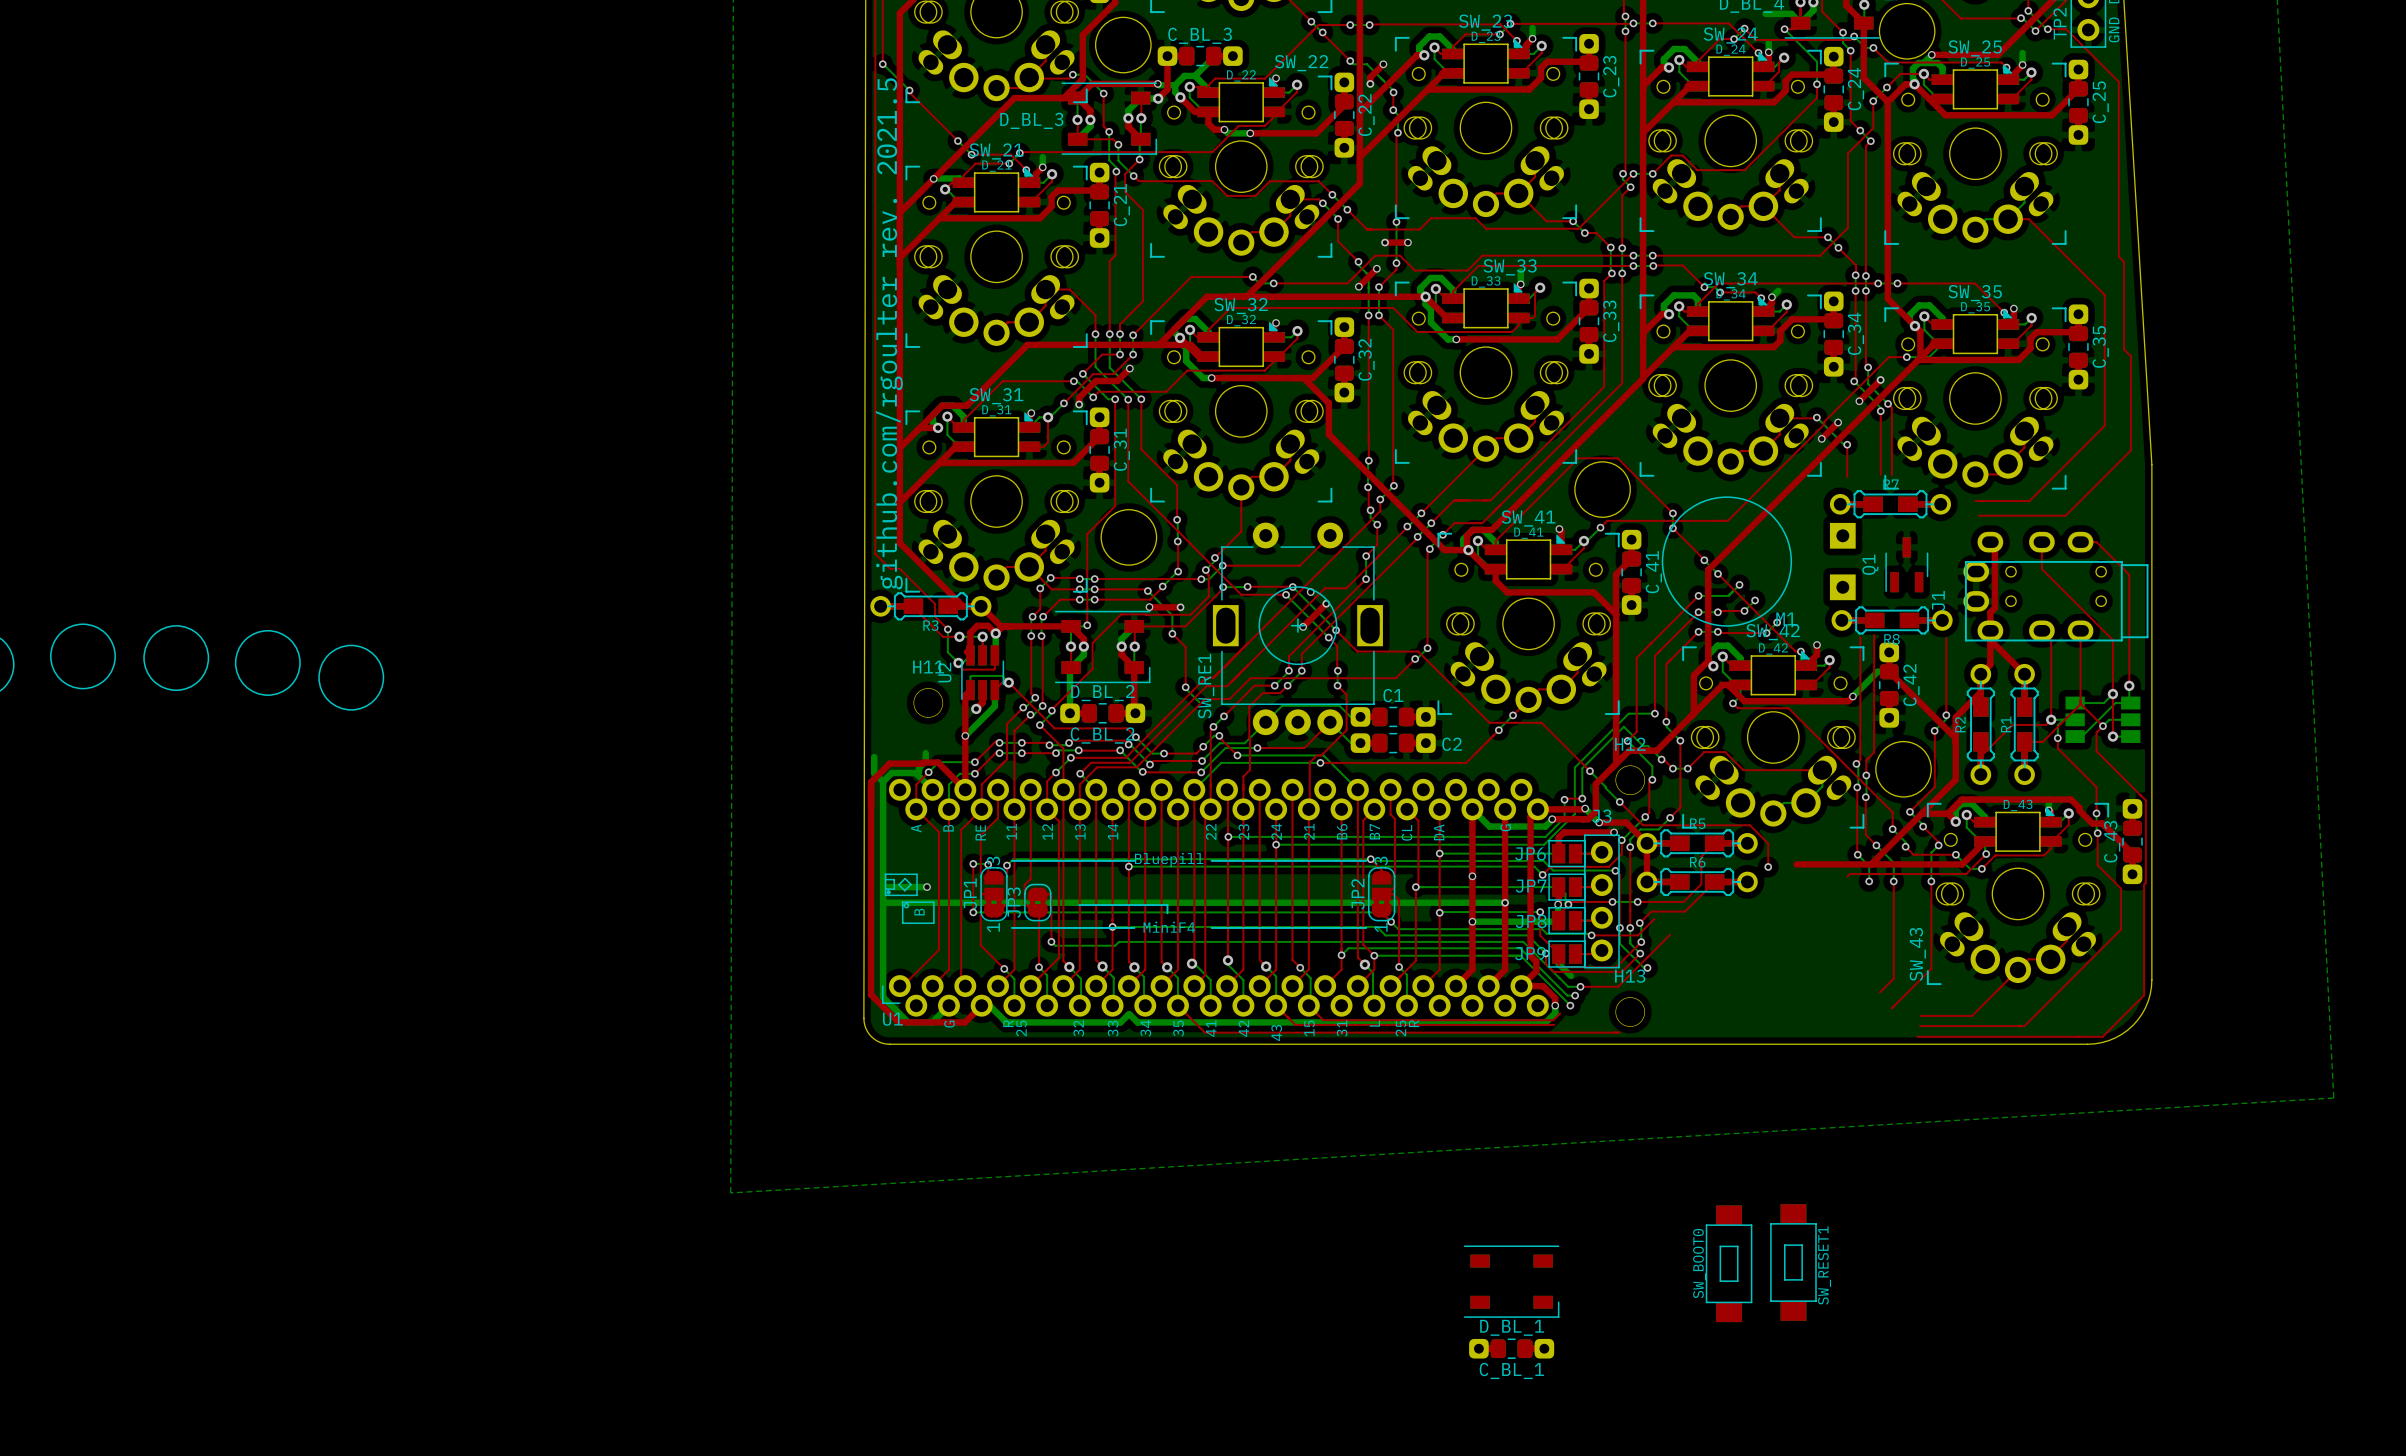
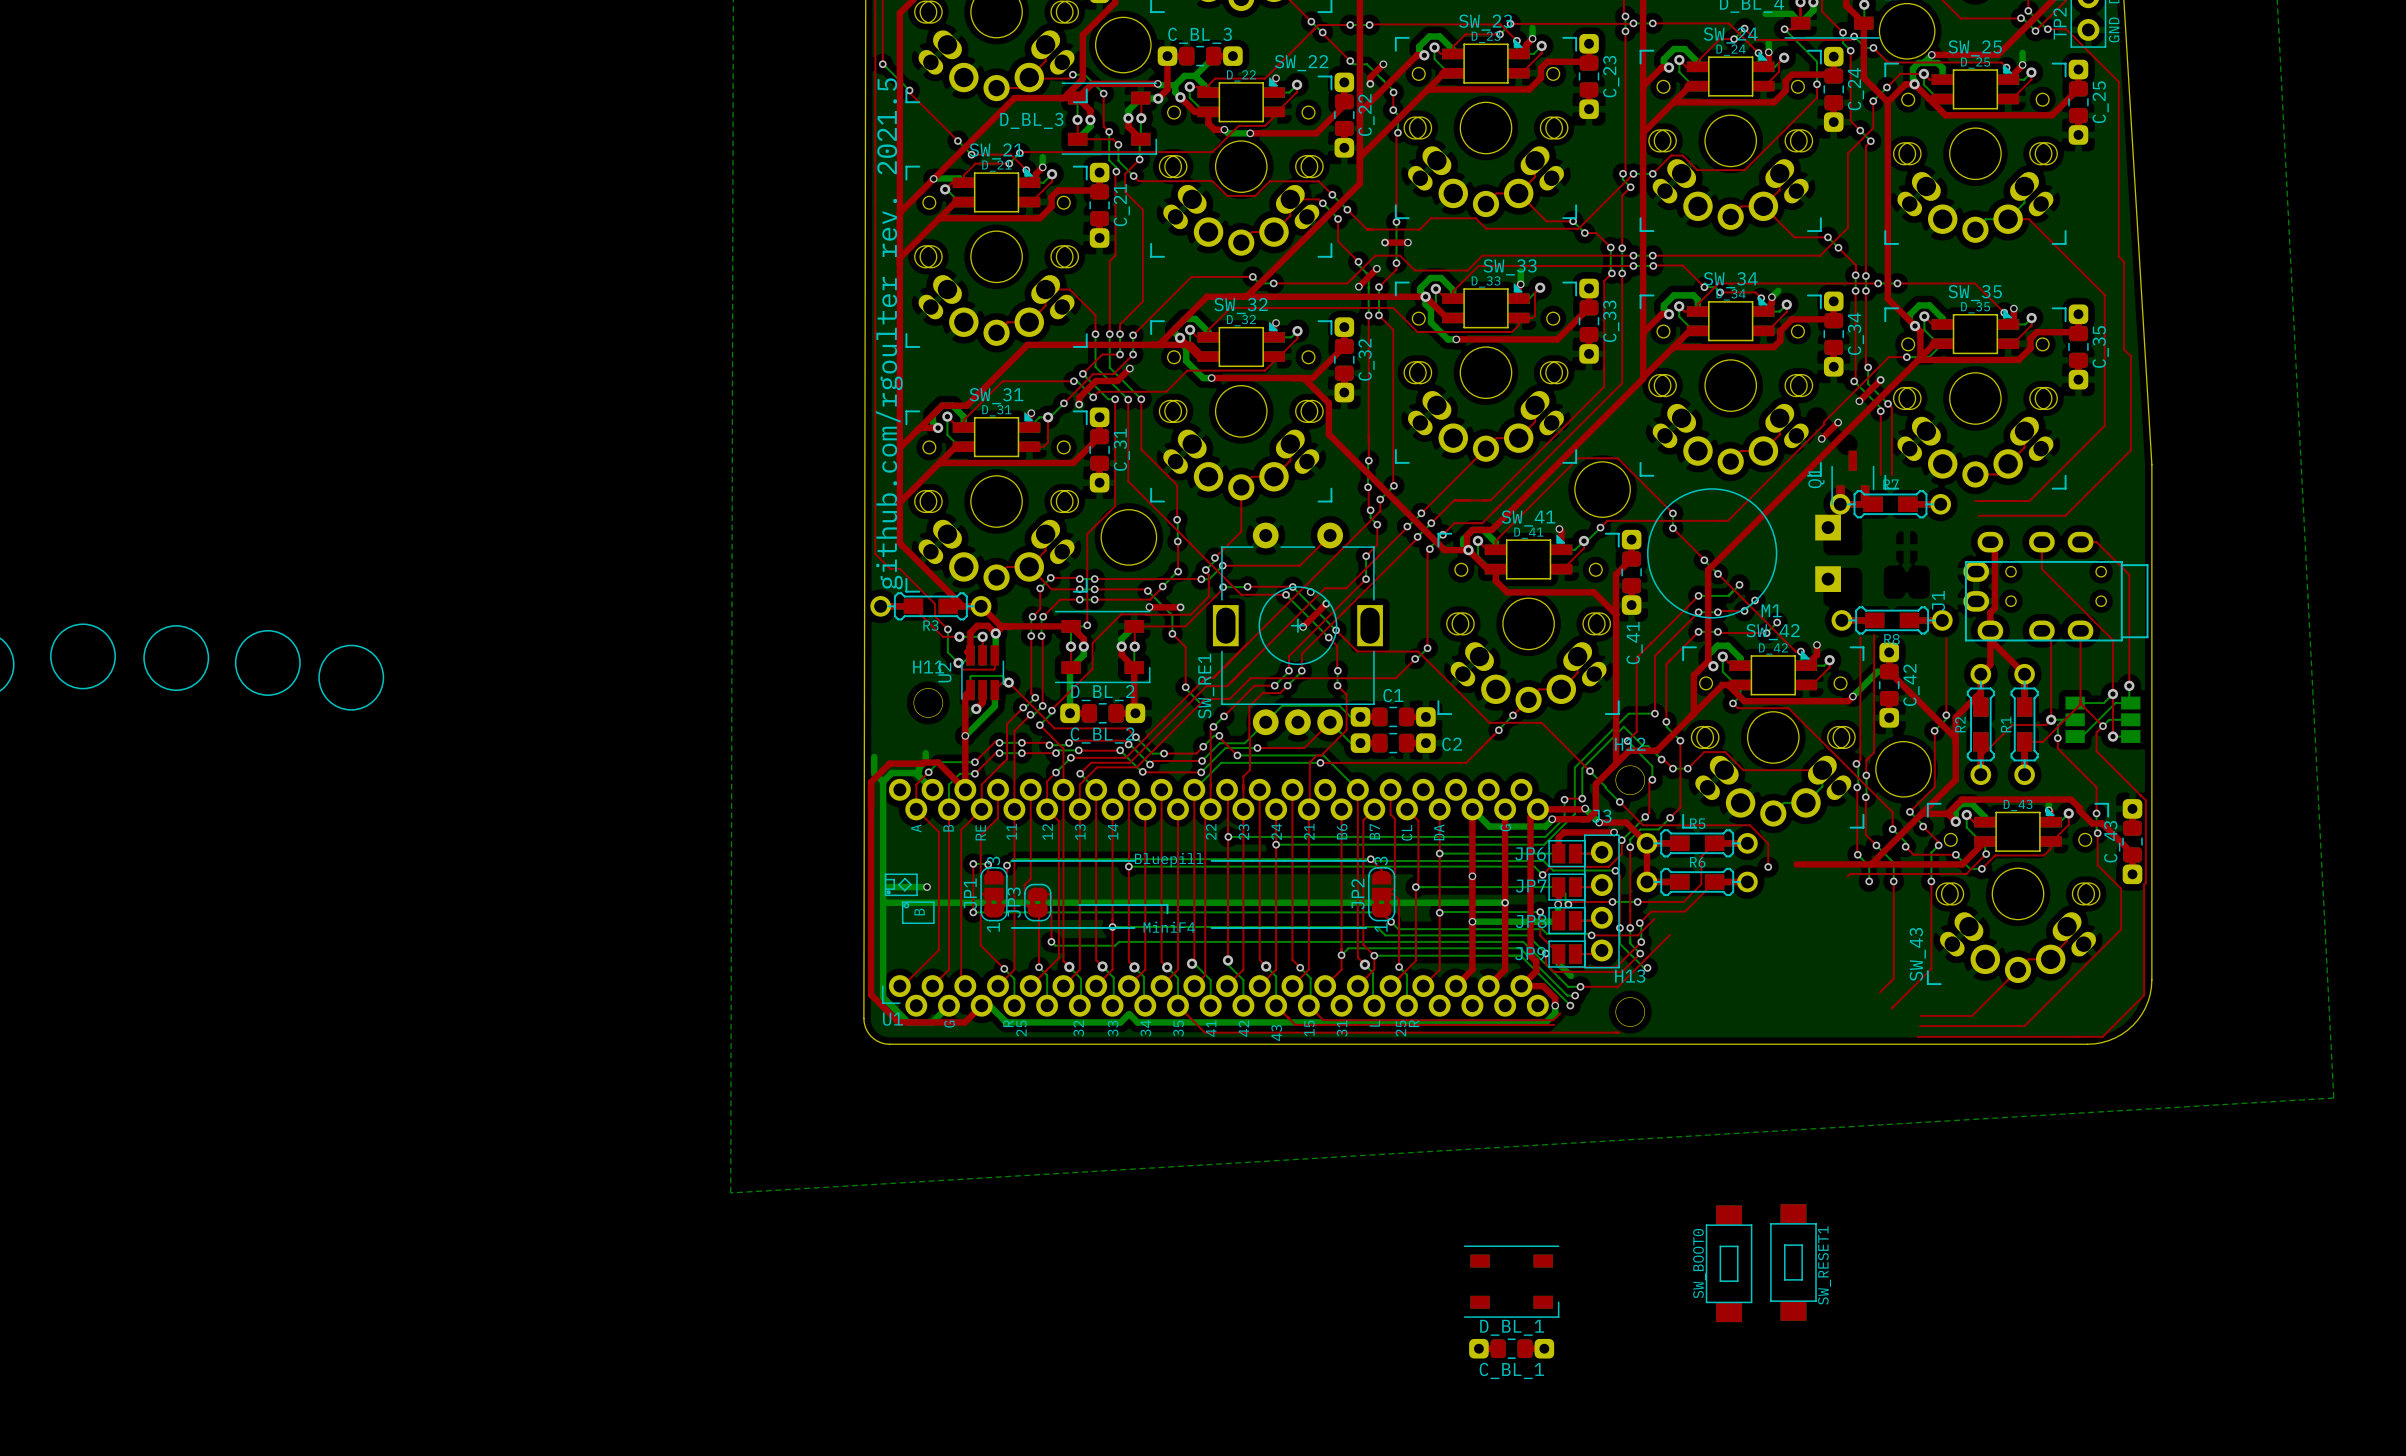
bottom track: (1816, 417) (1843, 444) (1847, 444) -> none
top track: (1816, 417) (1779, 418) -> none
via: (1816, 417) -> none
top track: (1847, 444) (1847, 477) -> none
via: (1847, 444) -> none
M1 position: (1758, 561) -> (1743, 553)
Q1 position: (1906, 564) -> (1852, 478)
C_41 name position: C_41 (1653, 572) -> C_41 (1634, 643)

